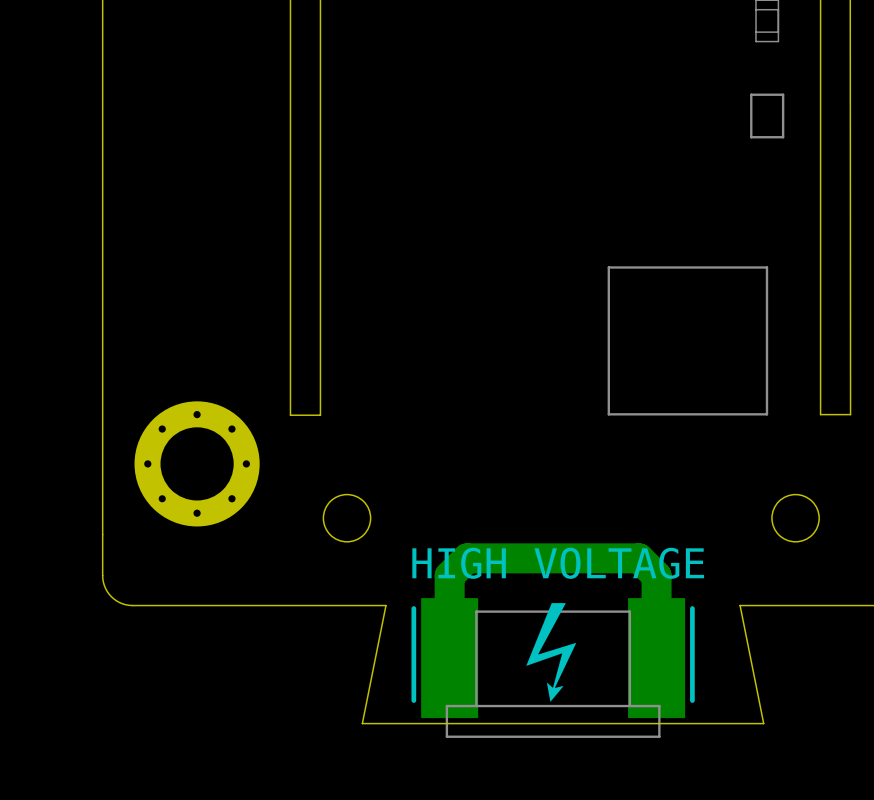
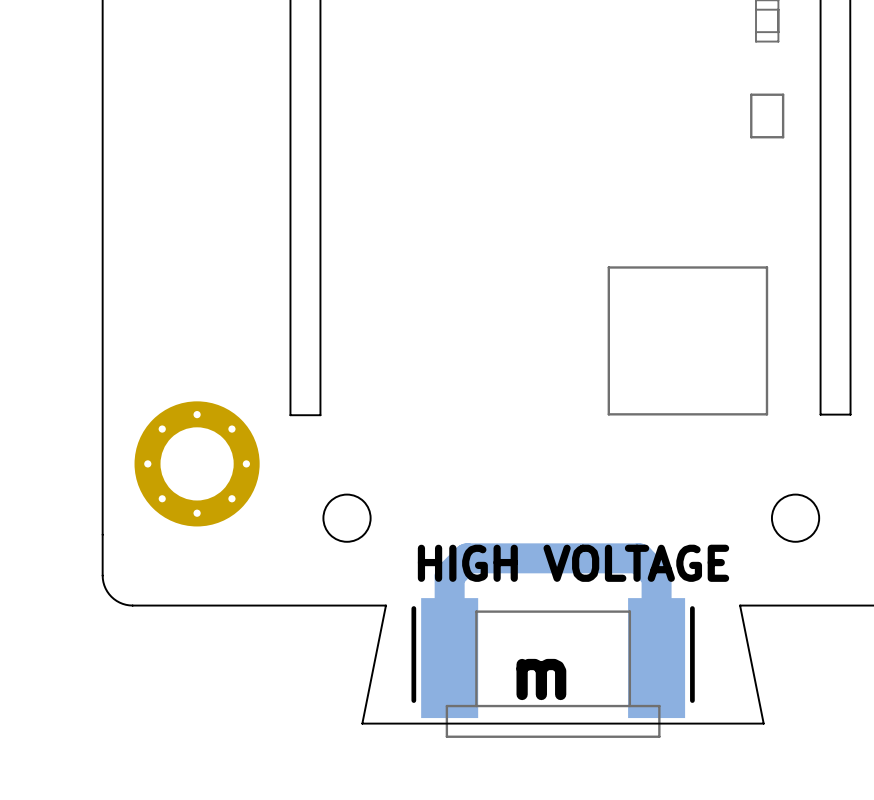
drawing: [526, 603, 577, 702] -> none
text: none -> m (541, 679)

